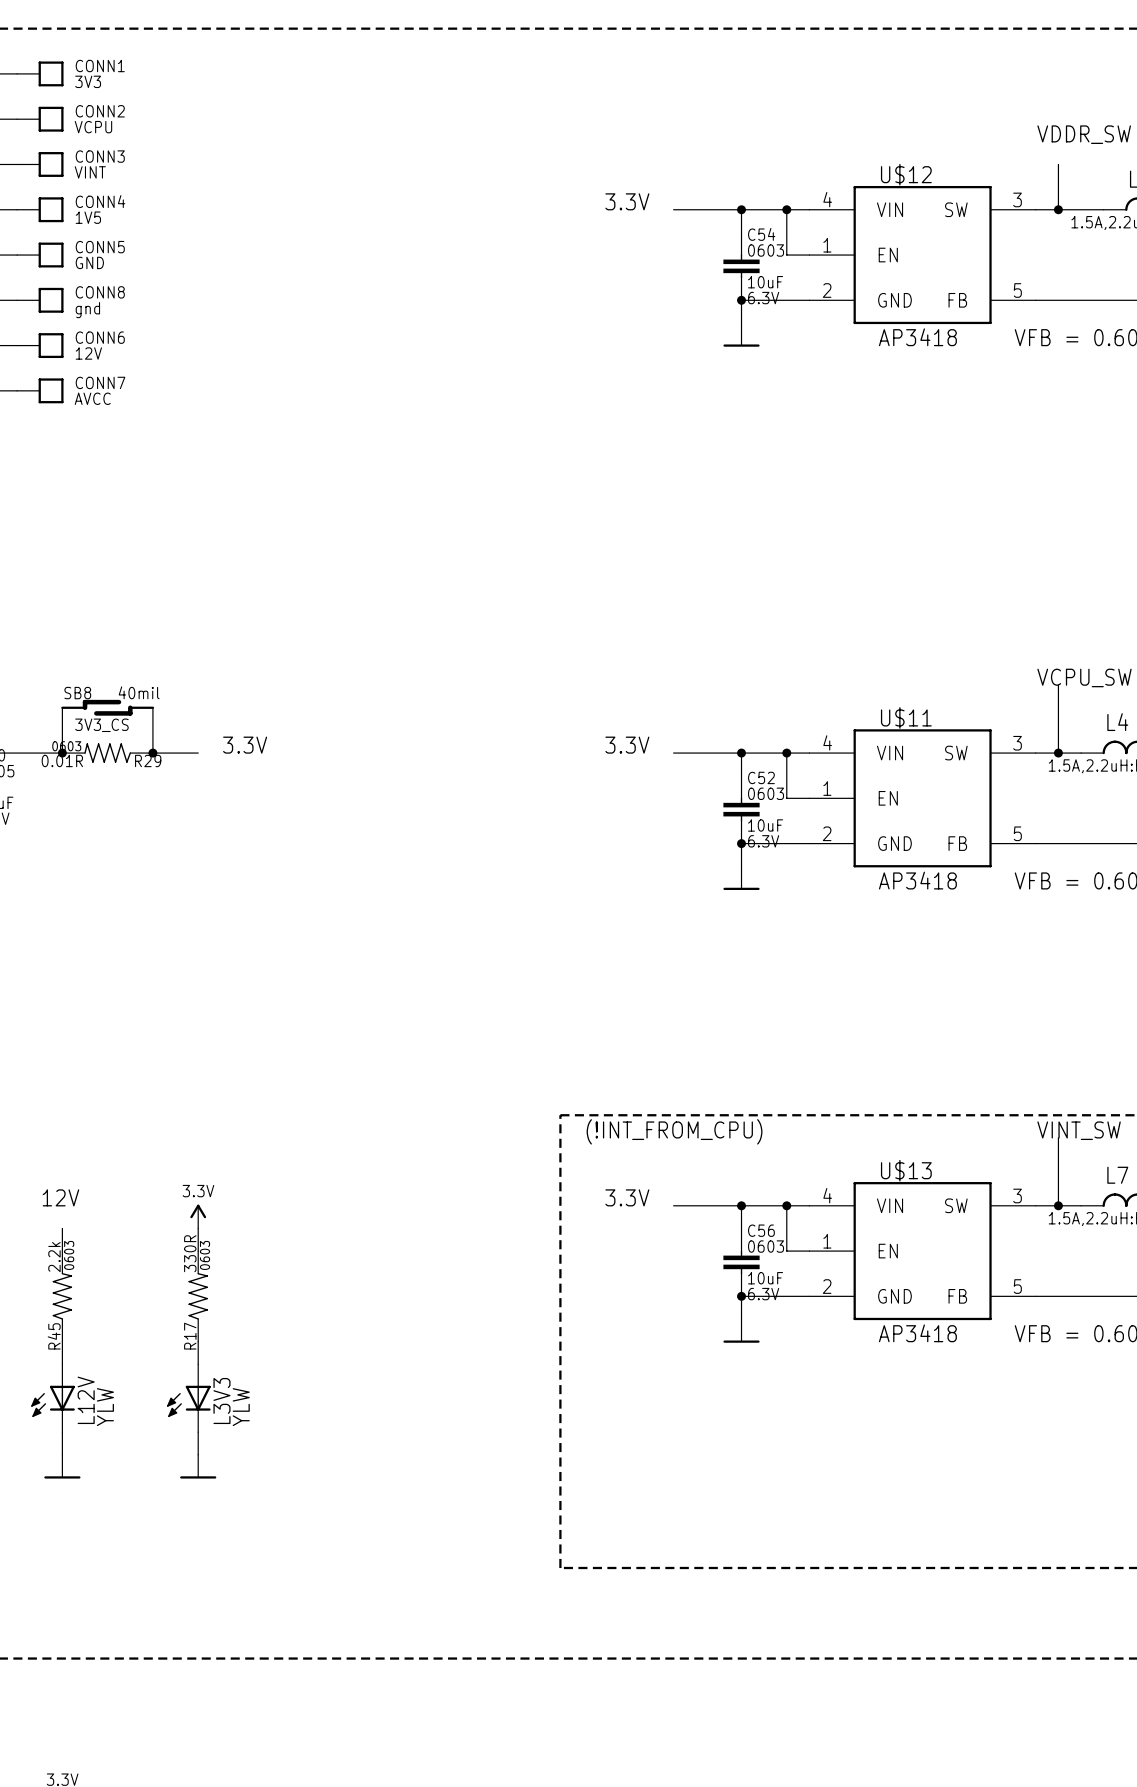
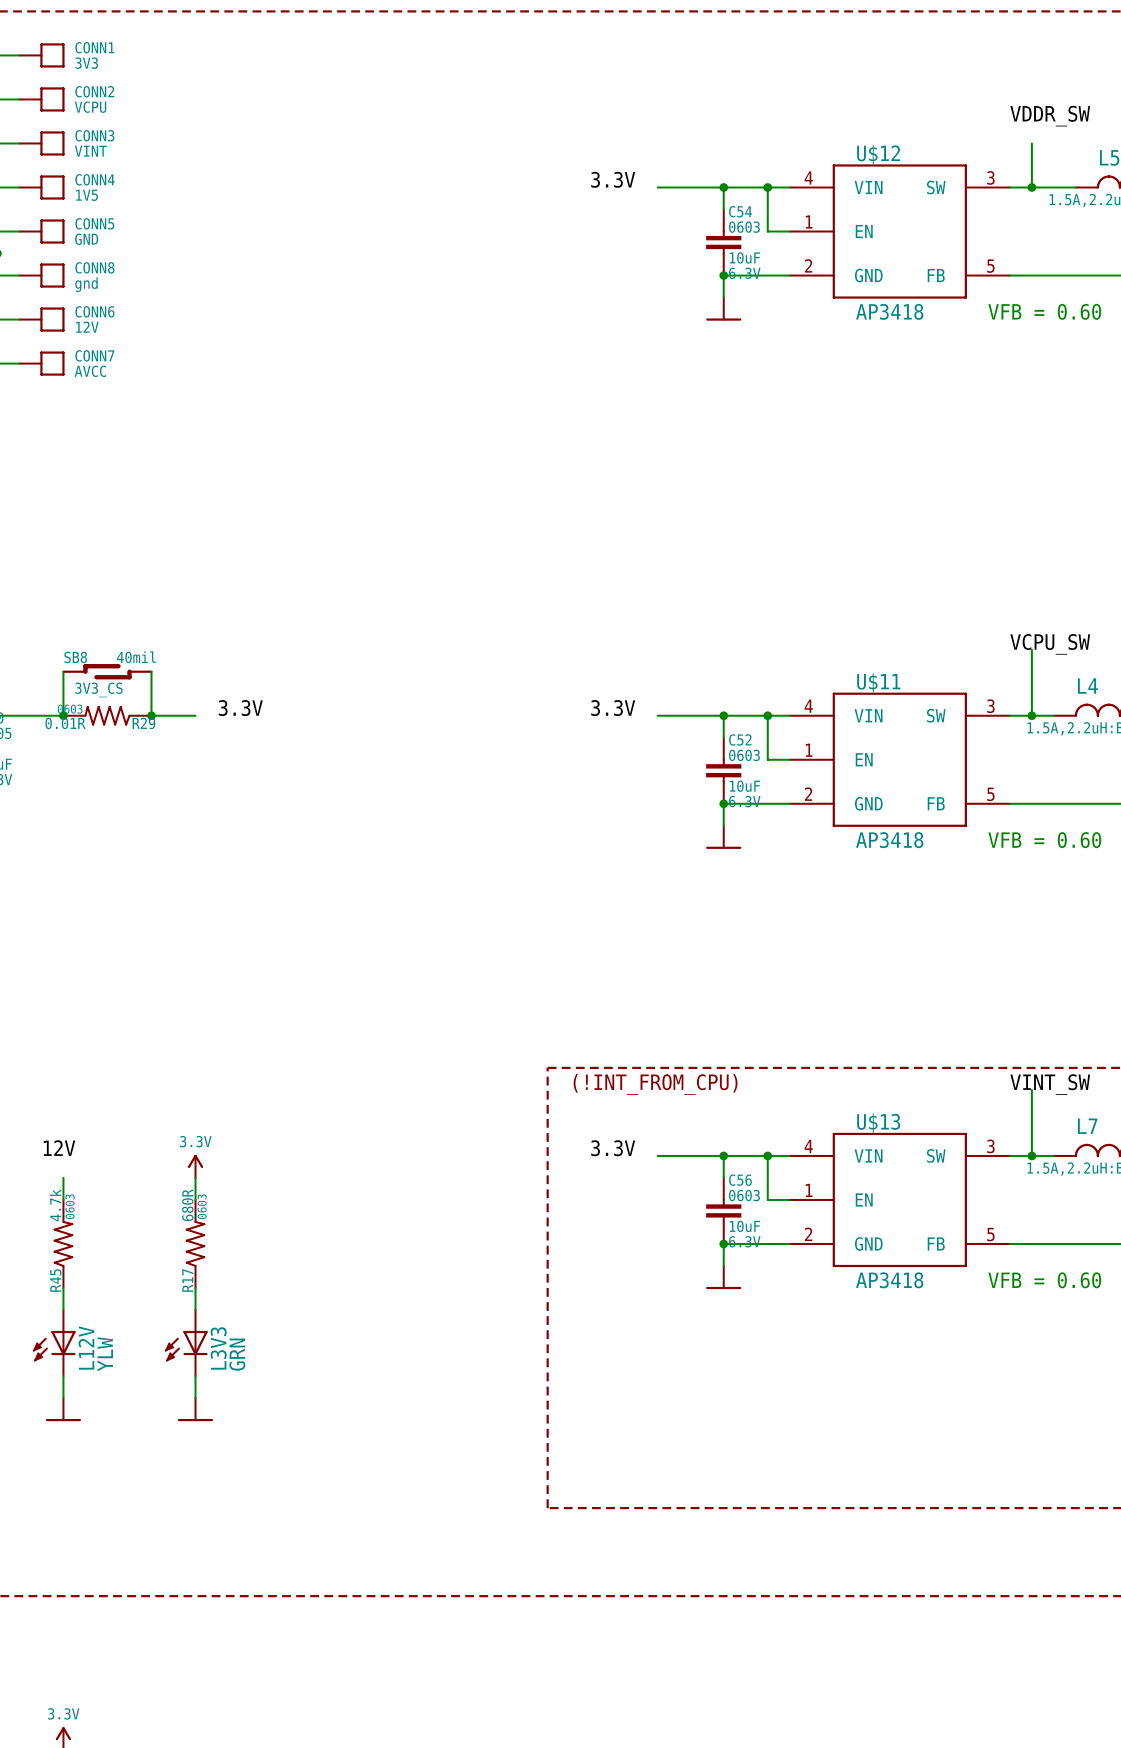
R17 value: 330R (190, 1253) -> 680R (187, 1205)
R45 value: 2.2k (54, 1257) -> 4.7k (55, 1205)
L3V3 value: YLW (241, 1407) -> GRN (237, 1354)

